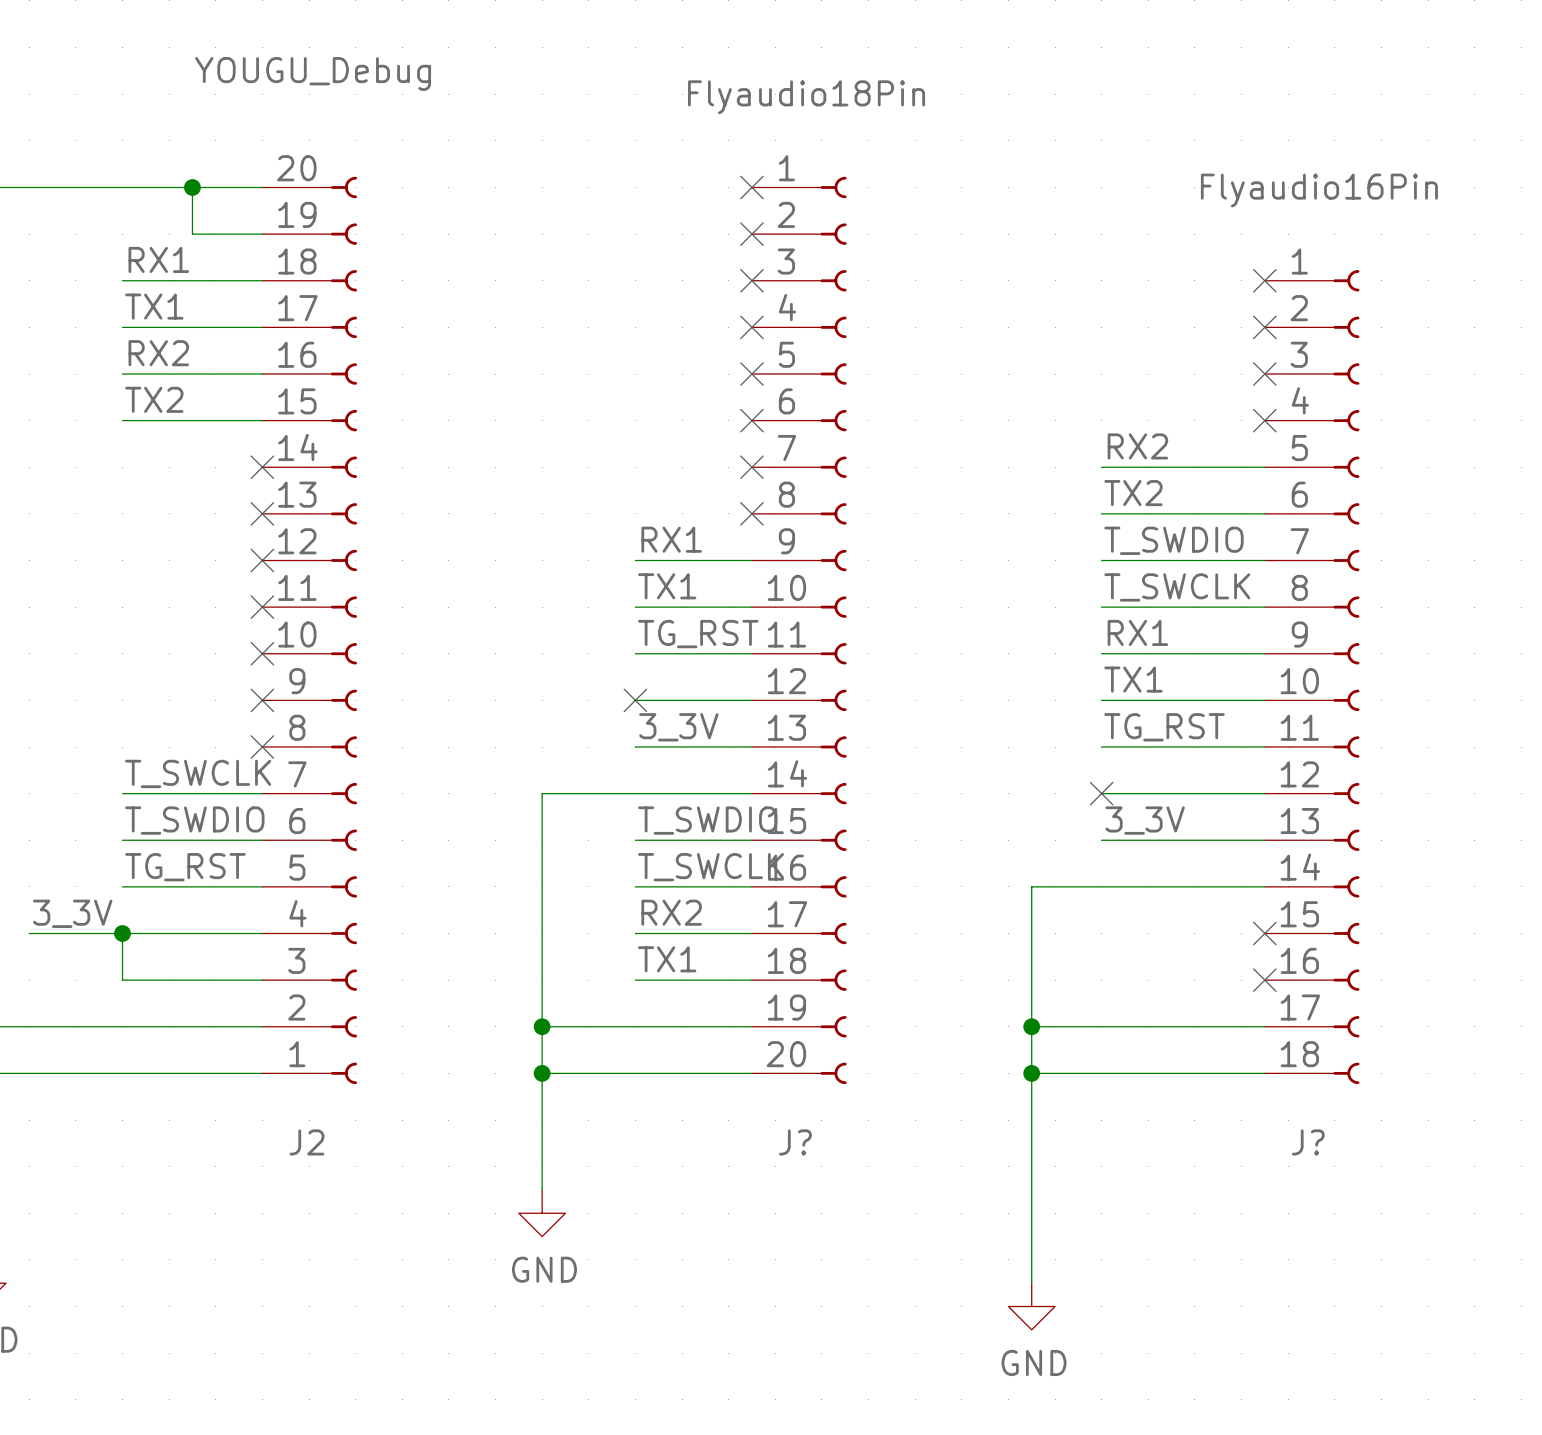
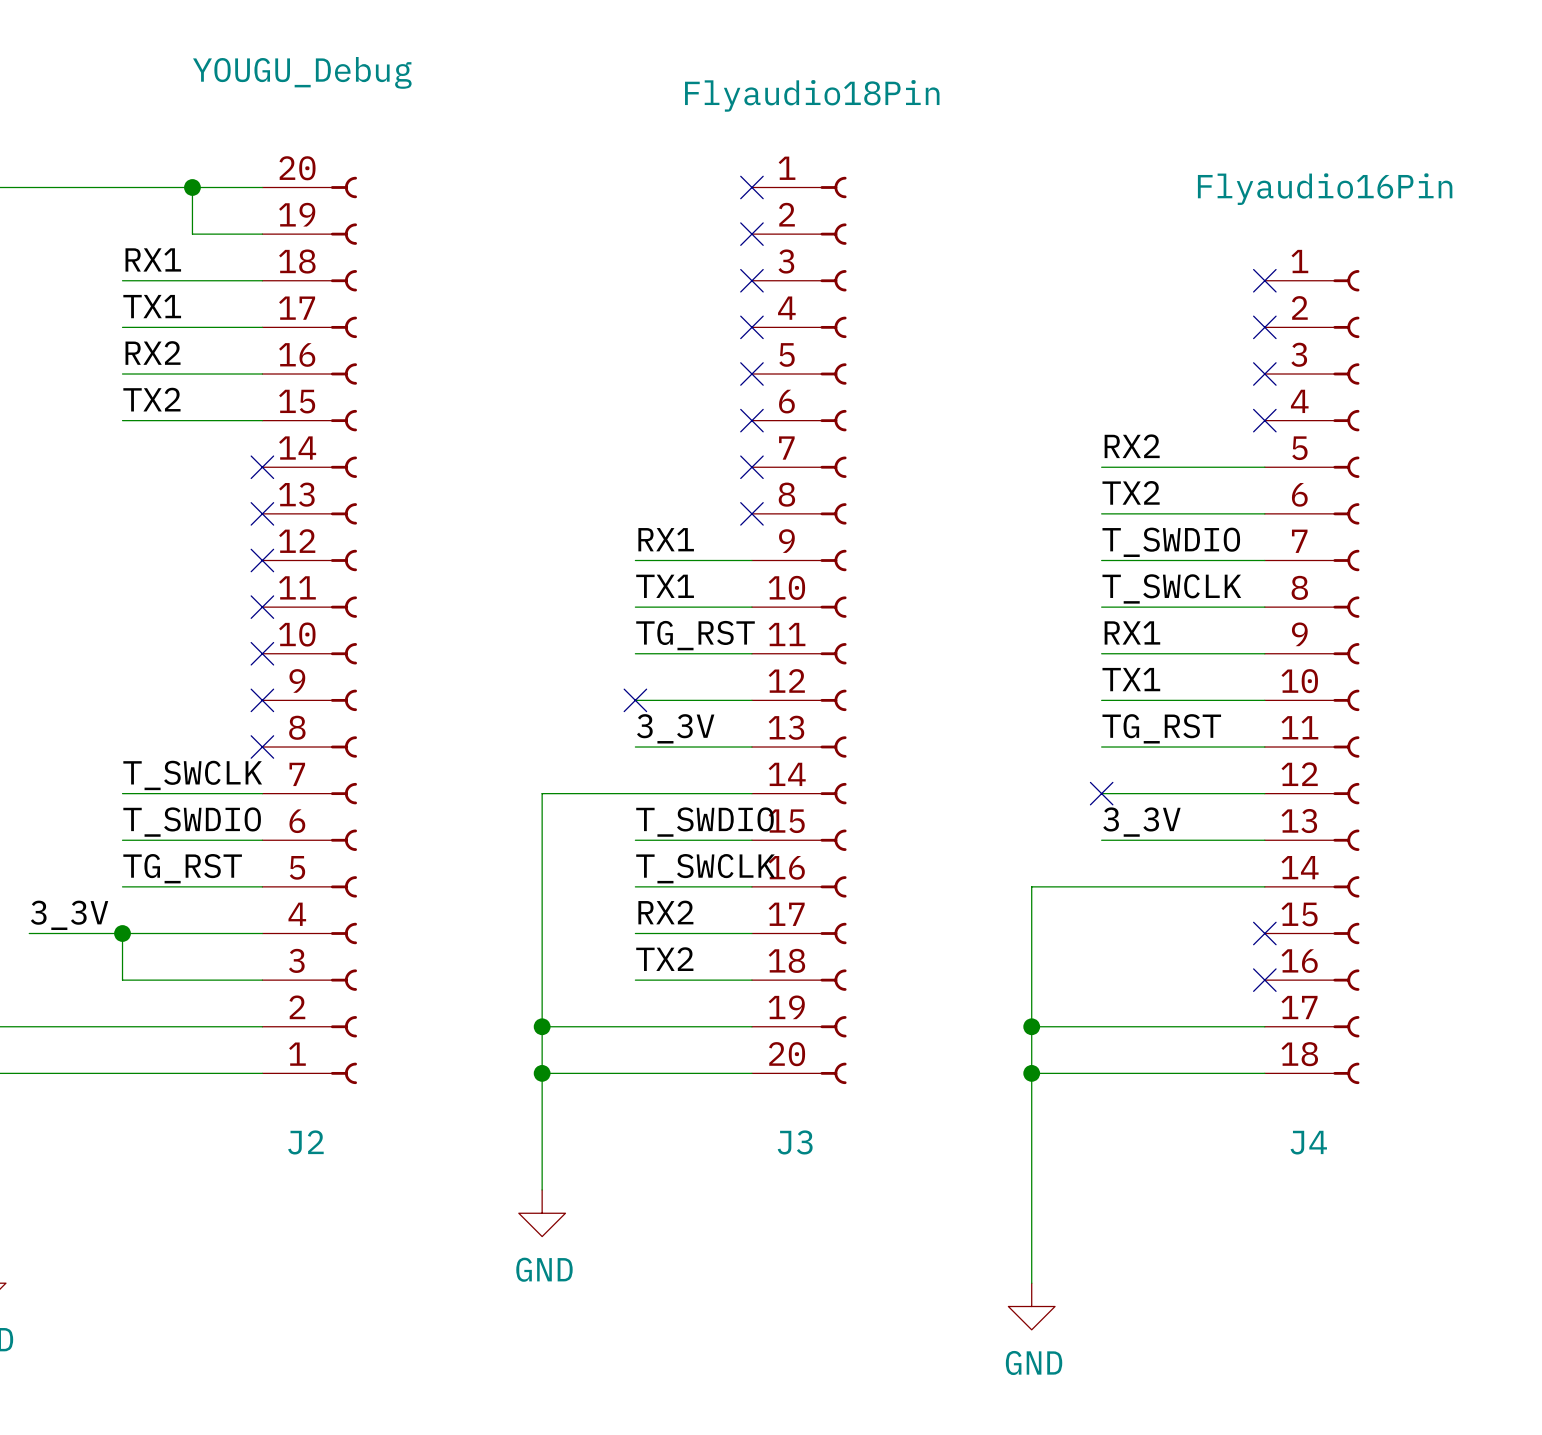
label: TX1 (667, 959) -> TX2 (664, 959)
J? name: J? (795, 1142) -> J3 (795, 1142)
J? name: J? (1308, 1142) -> J4 (1308, 1142)

